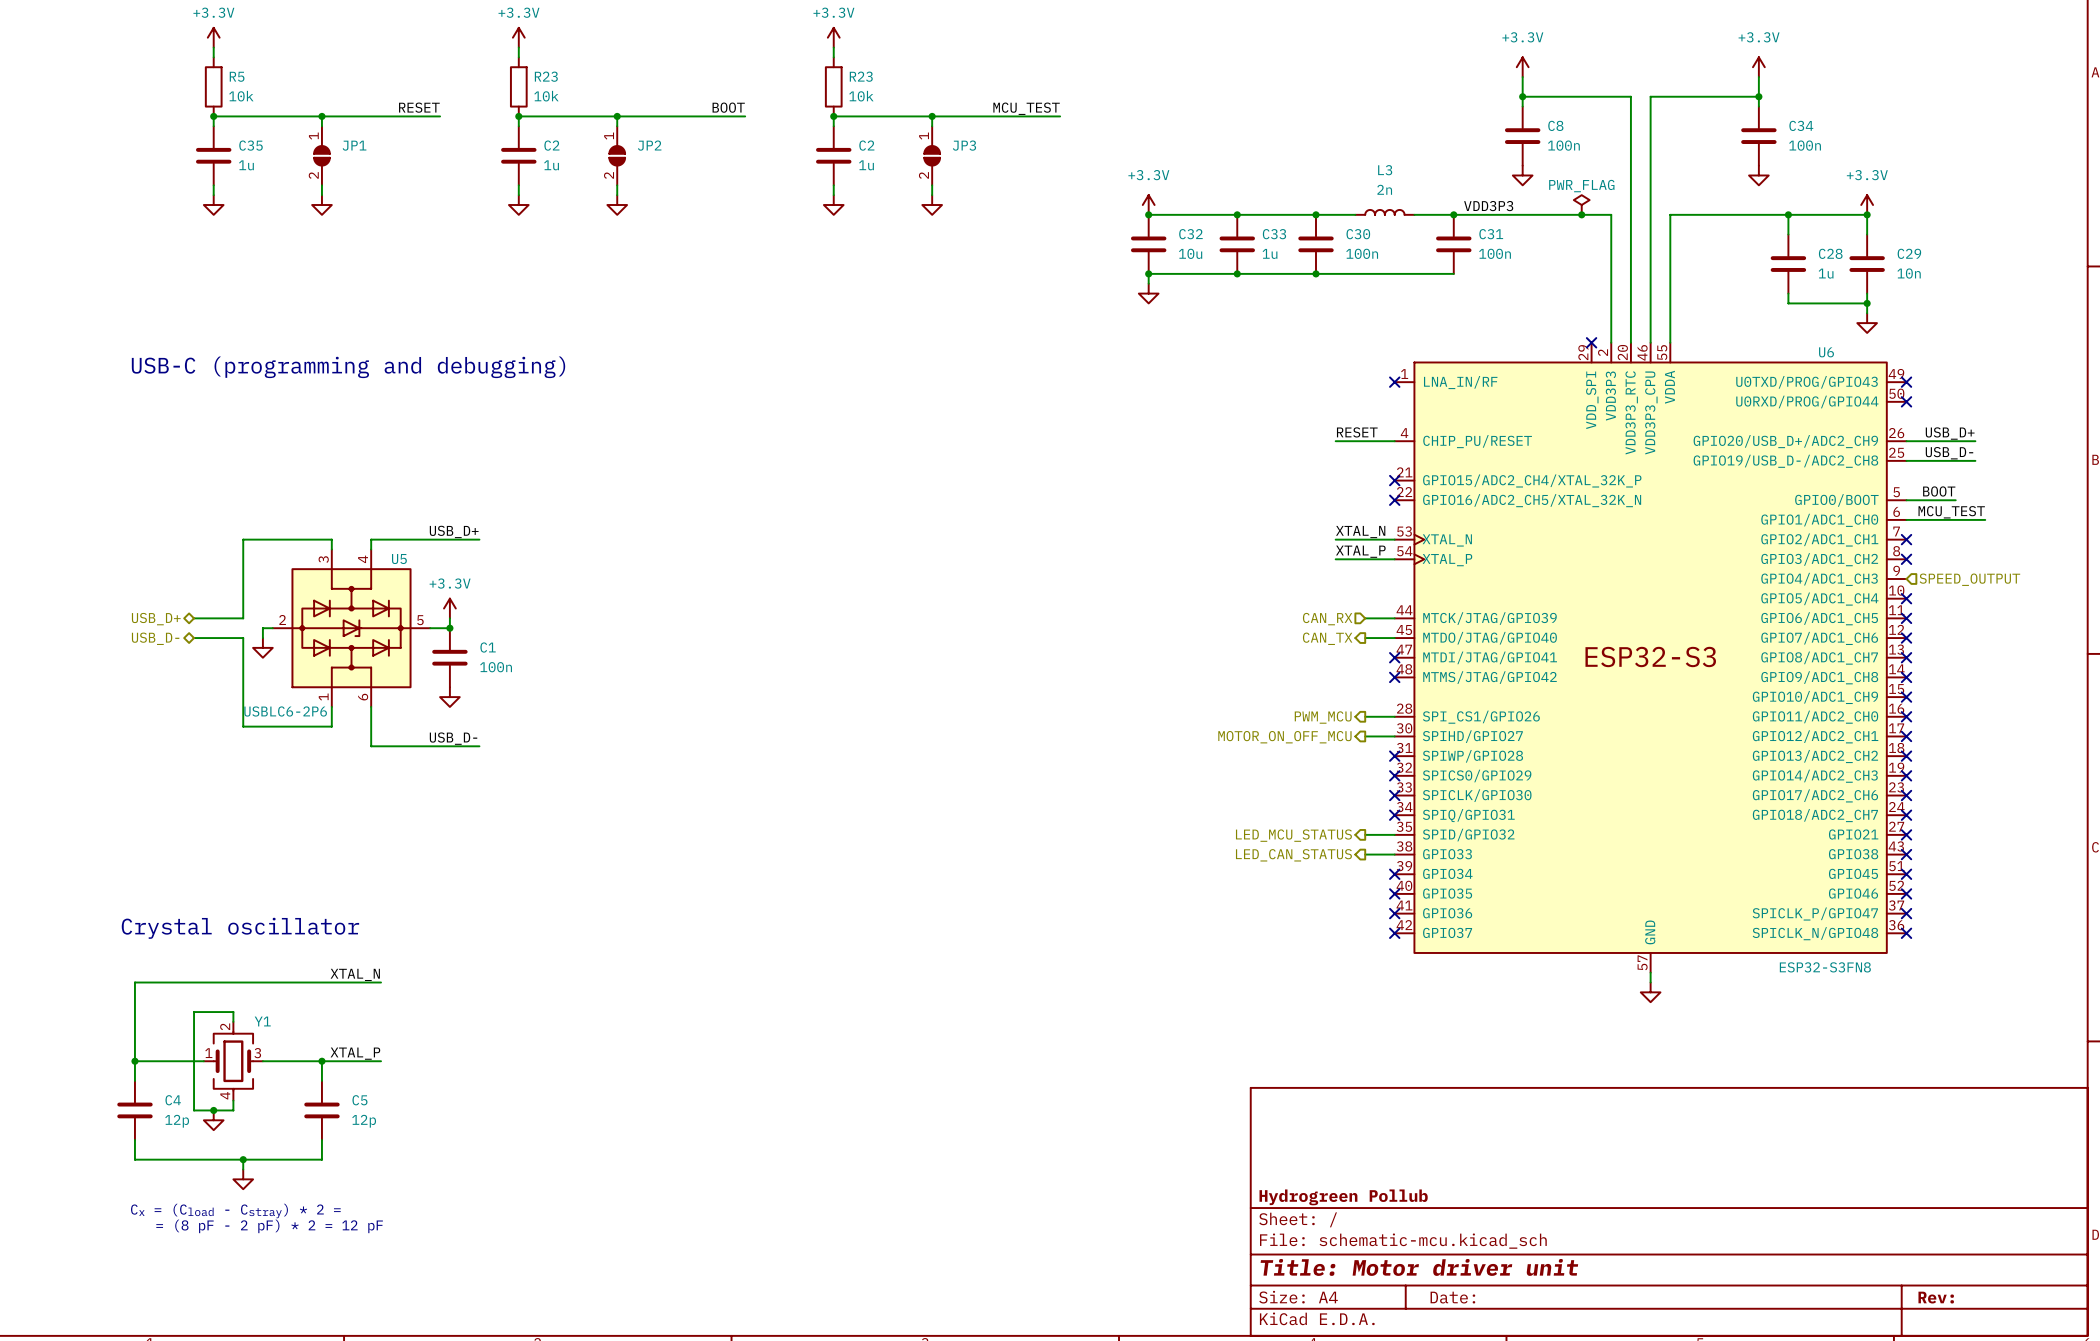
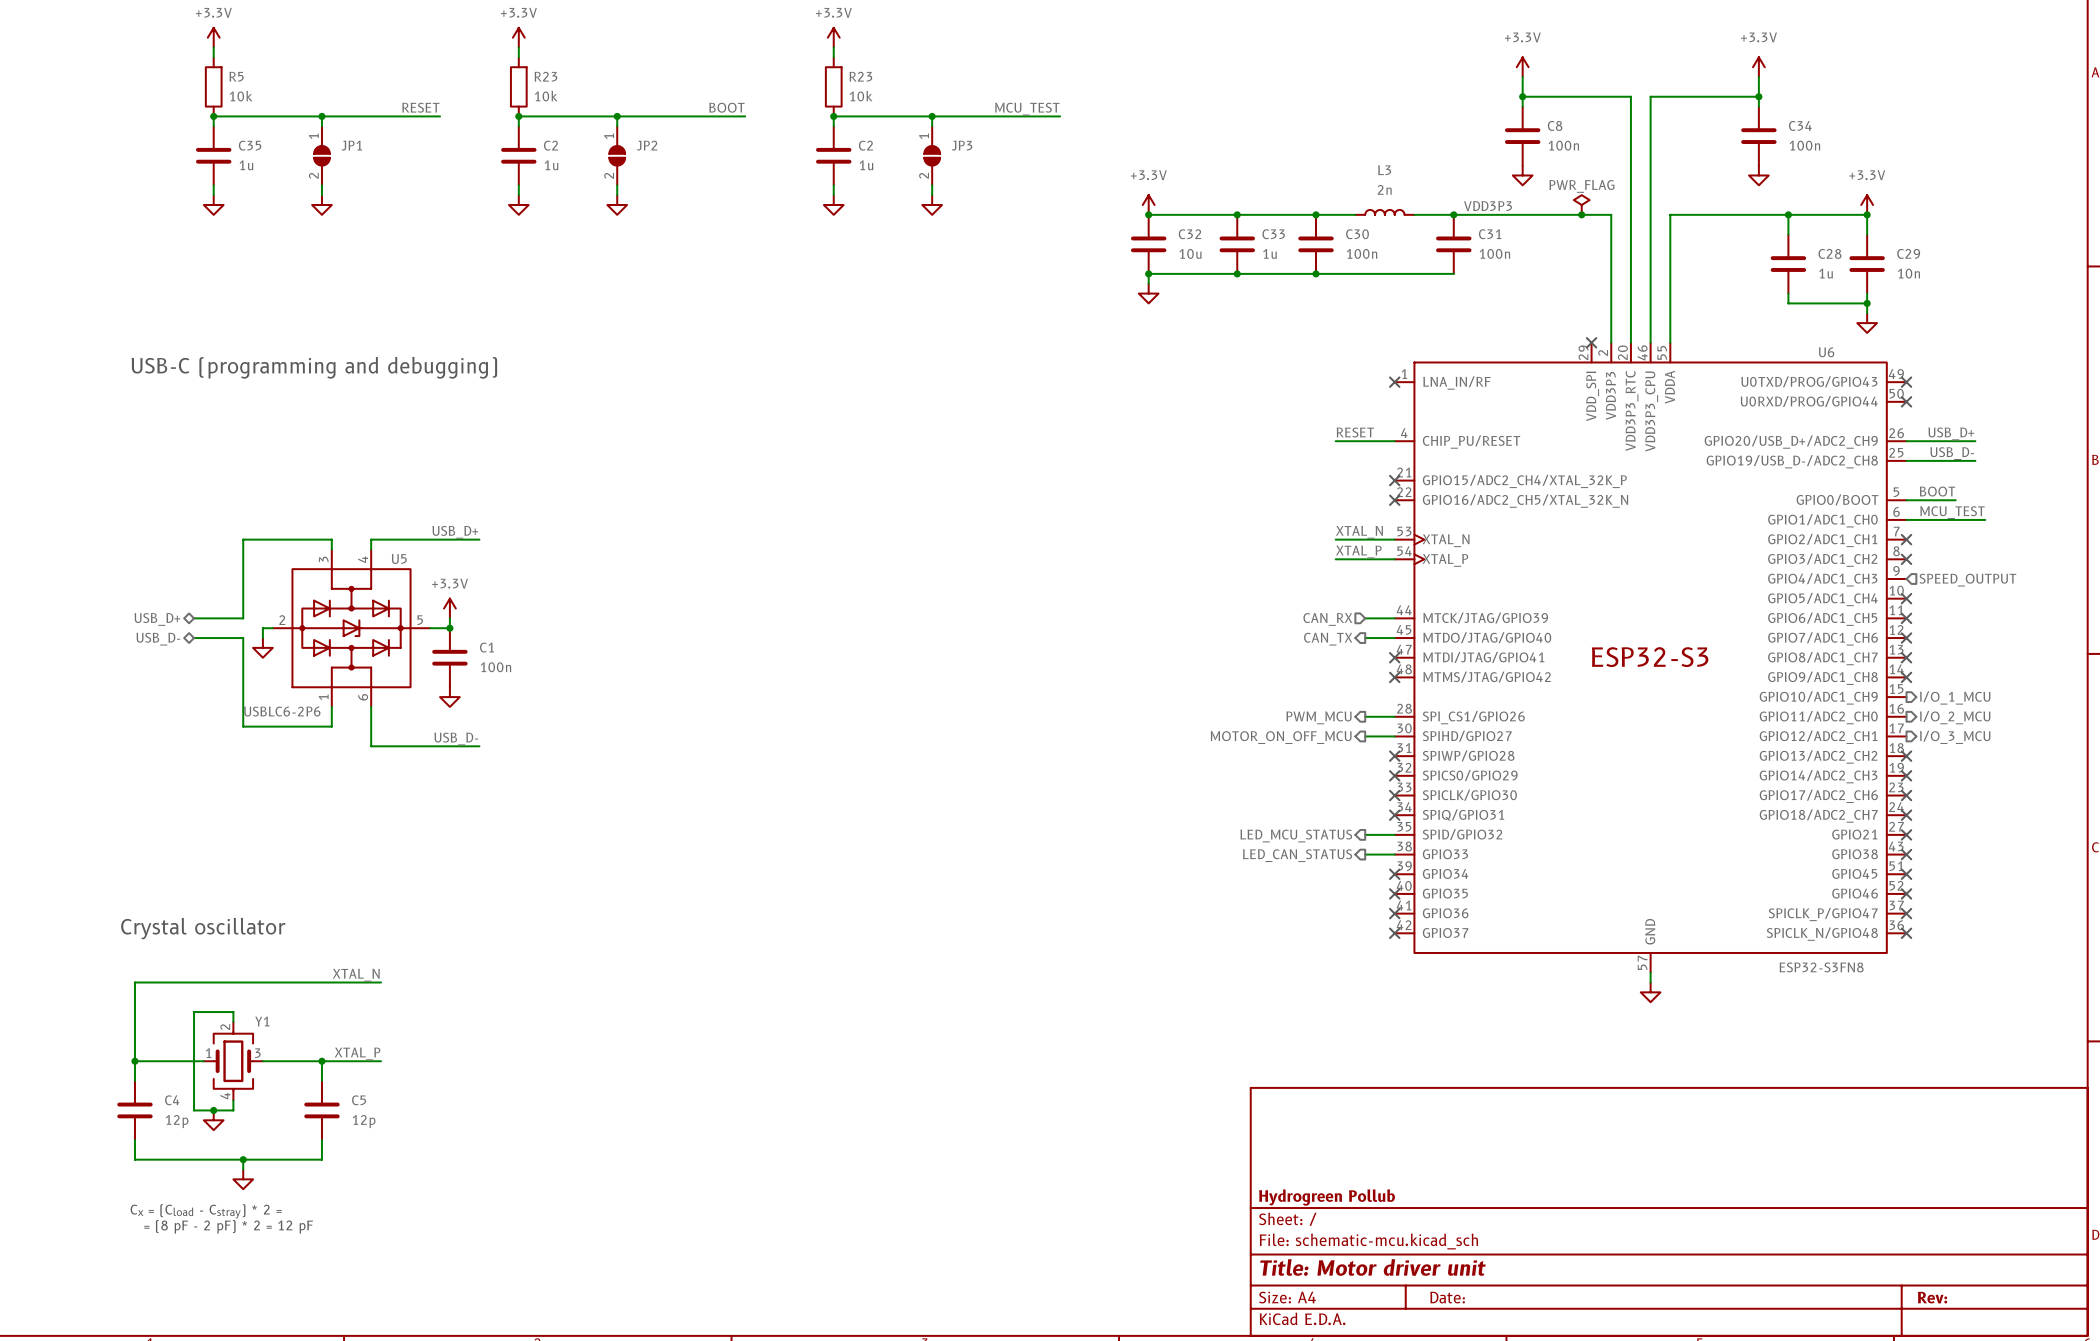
no-connect mark: (1906, 697) -> none
hierarchical label: none -> I/O_1_MCU (1955, 697)
no-connect mark: (1906, 716) -> none
hierarchical label: none -> I/O_2_MCU (1955, 717)
no-connect mark: (1906, 736) -> none
hierarchical label: none -> I/O_3_MCU (1955, 737)

